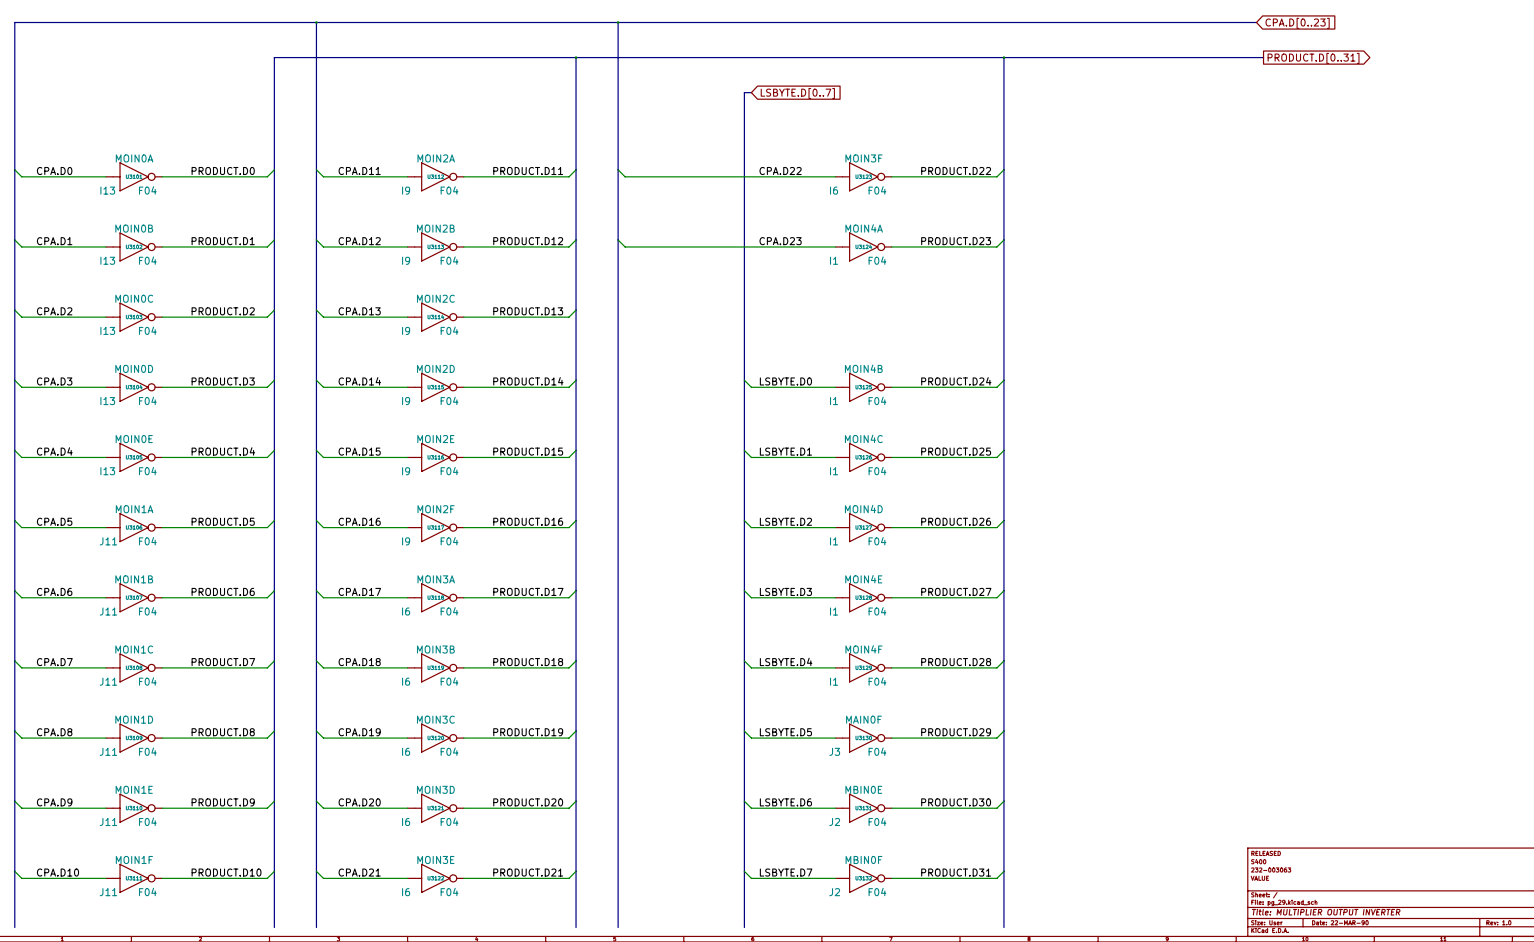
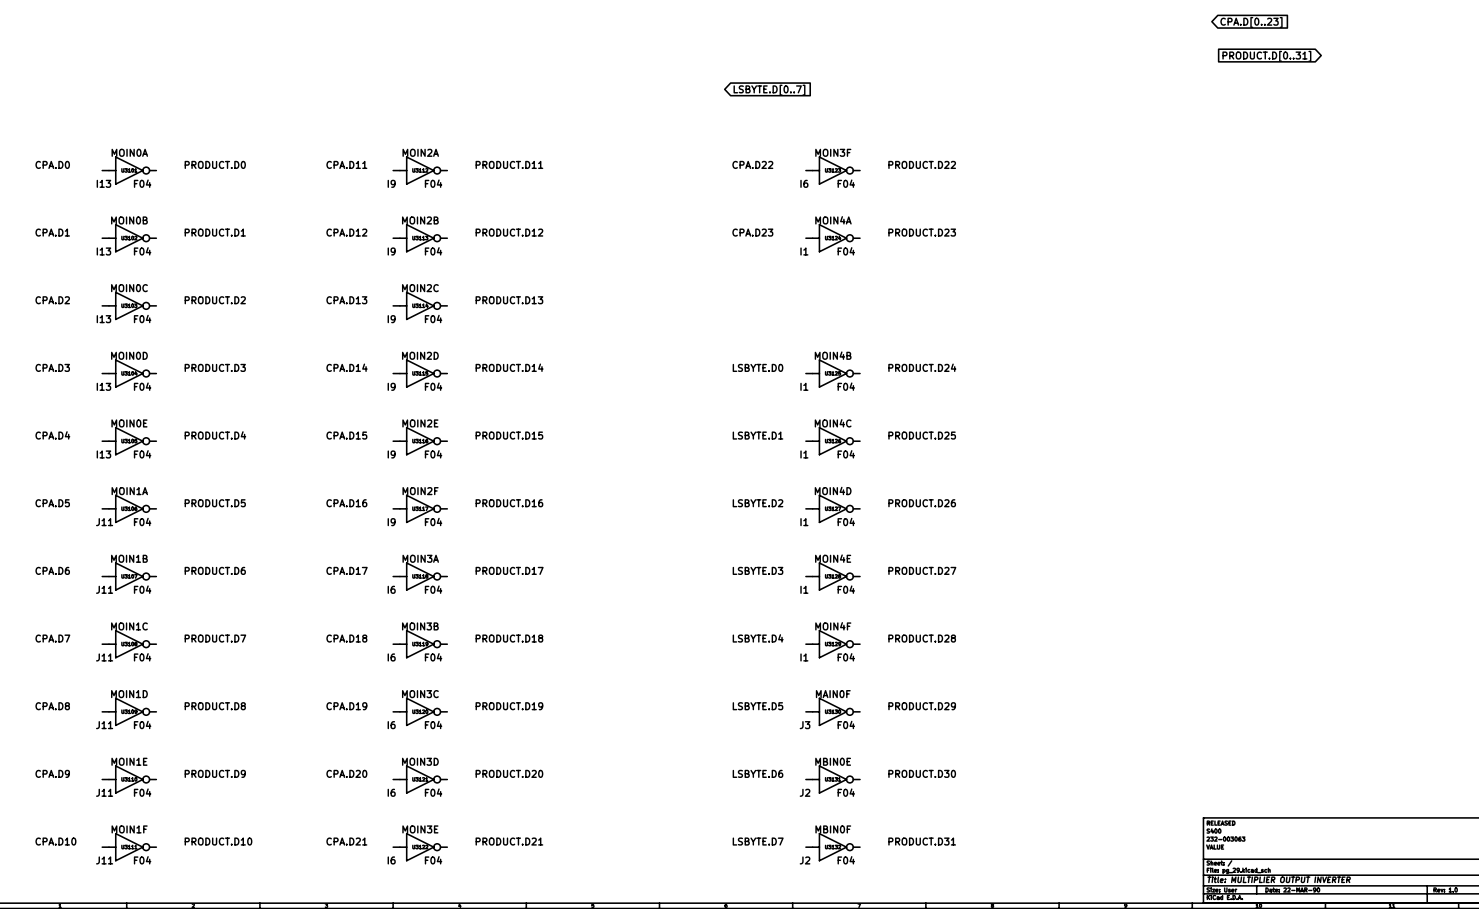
bus: (316, 22) (316, 927) -> none
junction: (316, 22) -> none
bus: (618, 22) (618, 927) -> none
junction: (618, 22) -> none
bus: (1256, 22) (14, 22) (14, 927) -> none
bus: (576, 57) (576, 927) -> none
junction: (576, 57) -> none
bus: (1003, 57) (1003, 927) -> none
junction: (1003, 57) -> none
bus: (1263, 57) (274, 57) (274, 927) -> none
bus: (751, 92) (744, 92) (744, 927) -> none
wire: (14, 169) (21, 176) (105, 176) -> none
wire: (274, 169) (267, 176) (162, 176) -> none
wire: (316, 169) (323, 176) (407, 176) -> none
wire: (576, 169) (569, 176) (463, 176) -> none
wire: (618, 169) (625, 176) (835, 176) -> none
wire: (1003, 169) (996, 176) (891, 176) -> none
wire: (14, 239) (21, 246) (105, 246) -> none
wire: (274, 239) (267, 246) (162, 246) -> none
wire: (316, 239) (323, 246) (407, 246) -> none
wire: (576, 239) (569, 246) (463, 246) -> none
wire: (618, 239) (625, 246) (835, 246) -> none
wire: (1003, 239) (996, 246) (891, 246) -> none
wire: (14, 310) (21, 317) (105, 317) -> none
wire: (274, 310) (267, 317) (162, 317) -> none
wire: (316, 310) (323, 317) (407, 317) -> none
wire: (576, 310) (569, 317) (463, 317) -> none
wire: (14, 380) (21, 387) (105, 387) -> none
wire: (274, 380) (267, 387) (162, 387) -> none
wire: (316, 380) (323, 387) (407, 387) -> none
wire: (576, 380) (569, 387) (463, 387) -> none
wire: (744, 380) (751, 387) (835, 387) -> none
wire: (1003, 380) (996, 387) (891, 387) -> none
wire: (14, 450) (21, 457) (105, 457) -> none
wire: (274, 450) (267, 457) (162, 457) -> none
wire: (316, 450) (323, 457) (407, 457) -> none
wire: (576, 450) (569, 457) (463, 457) -> none
wire: (744, 450) (751, 457) (835, 457) -> none
wire: (1003, 450) (996, 457) (891, 457) -> none
wire: (14, 520) (21, 527) (105, 527) -> none
wire: (274, 520) (267, 527) (162, 527) -> none
wire: (316, 520) (323, 527) (407, 527) -> none
wire: (576, 520) (569, 527) (463, 527) -> none
wire: (744, 520) (751, 527) (835, 527) -> none
wire: (1003, 520) (996, 527) (891, 527) -> none
wire: (14, 590) (21, 597) (105, 597) -> none
wire: (274, 590) (267, 597) (162, 597) -> none
wire: (316, 590) (323, 597) (407, 597) -> none
wire: (576, 590) (569, 597) (463, 597) -> none
wire: (744, 590) (751, 597) (835, 597) -> none
wire: (1003, 590) (996, 597) (891, 597) -> none
wire: (14, 660) (21, 667) (105, 667) -> none
wire: (274, 660) (267, 667) (162, 667) -> none
wire: (316, 660) (323, 667) (407, 667) -> none
wire: (576, 660) (569, 667) (463, 667) -> none
wire: (744, 660) (751, 667) (835, 667) -> none
wire: (1003, 660) (996, 667) (891, 667) -> none
wire: (14, 731) (21, 738) (105, 738) -> none
wire: (274, 731) (267, 738) (162, 738) -> none
wire: (316, 731) (323, 738) (407, 738) -> none
wire: (576, 731) (569, 738) (463, 738) -> none
wire: (744, 731) (751, 738) (835, 738) -> none
wire: (1003, 731) (996, 738) (891, 738) -> none
wire: (14, 801) (21, 808) (105, 808) -> none
wire: (274, 801) (267, 808) (162, 808) -> none
wire: (316, 801) (323, 808) (407, 808) -> none
wire: (576, 801) (569, 808) (463, 808) -> none
wire: (744, 801) (751, 808) (835, 808) -> none
wire: (1003, 801) (996, 808) (891, 808) -> none
wire: (14, 871) (21, 878) (105, 878) -> none
wire: (274, 871) (267, 878) (162, 878) -> none
wire: (316, 871) (323, 878) (407, 878) -> none
wire: (576, 871) (569, 878) (463, 878) -> none
wire: (744, 871) (751, 878) (835, 878) -> none
wire: (1003, 871) (996, 878) (891, 878) -> none

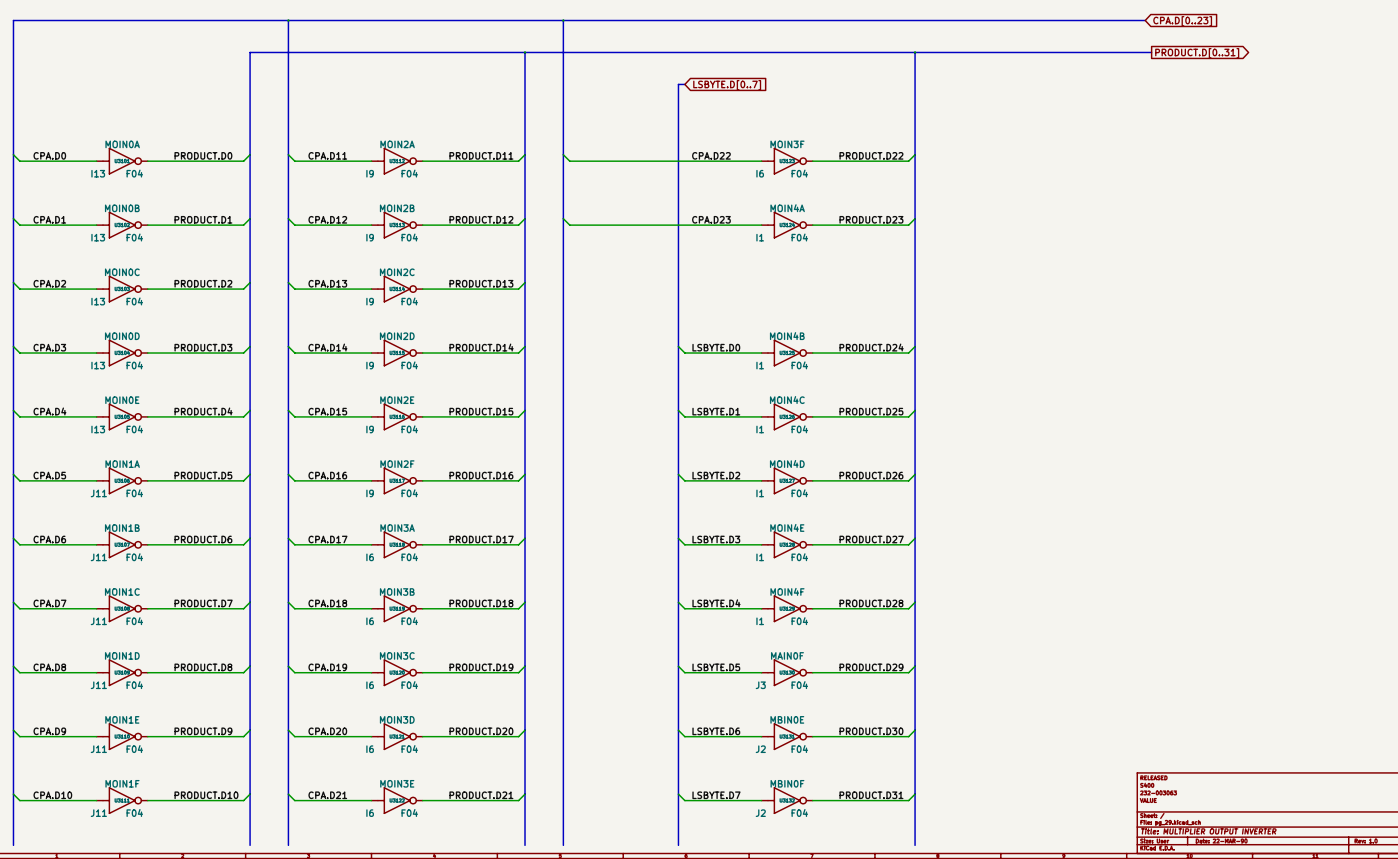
bus: none -> (288, 20) (288, 845)
junction: none -> (288, 20)
bus: none -> (563, 20) (563, 845)
junction: none -> (563, 20)
bus: none -> (1145, 20) (13, 20) (13, 845)
bus: none -> (525, 52) (525, 845)
junction: none -> (525, 52)
bus: none -> (915, 52) (915, 845)
junction: none -> (915, 52)
bus: none -> (1151, 52) (250, 52) (250, 845)
bus: none -> (684, 84) (678, 84) (678, 845)
wire: none -> (13, 154) (19, 161) (96, 161)
wire: none -> (250, 154) (243, 161) (147, 161)
wire: none -> (288, 154) (294, 161) (371, 161)
wire: none -> (525, 154) (518, 161) (422, 161)
wire: none -> (563, 154) (569, 161) (761, 161)
wire: none -> (915, 154) (908, 161) (812, 161)
wire: none -> (13, 218) (19, 225) (96, 225)
wire: none -> (250, 218) (243, 225) (147, 225)
wire: none -> (288, 218) (294, 225) (371, 225)
wire: none -> (525, 218) (518, 225) (422, 225)
wire: none -> (563, 218) (569, 225) (761, 225)
wire: none -> (915, 218) (908, 225) (812, 225)
wire: none -> (13, 282) (19, 289) (96, 289)
wire: none -> (250, 282) (243, 289) (147, 289)
wire: none -> (288, 282) (294, 289) (371, 289)
wire: none -> (525, 282) (518, 289) (422, 289)
wire: none -> (13, 346) (19, 353) (96, 353)
wire: none -> (250, 346) (243, 353) (147, 353)
wire: none -> (288, 346) (294, 353) (371, 353)
wire: none -> (525, 346) (518, 353) (422, 353)
wire: none -> (678, 346) (684, 353) (761, 353)
wire: none -> (915, 346) (908, 353) (812, 353)
wire: none -> (13, 410) (19, 416) (96, 416)
wire: none -> (250, 410) (243, 416) (147, 416)
wire: none -> (288, 410) (294, 416) (371, 416)
wire: none -> (525, 410) (518, 416) (422, 416)
wire: none -> (678, 410) (684, 416) (761, 416)
wire: none -> (915, 410) (908, 416) (812, 416)
wire: none -> (13, 474) (19, 480) (96, 480)
wire: none -> (250, 474) (243, 480) (147, 480)
wire: none -> (288, 474) (294, 480) (371, 480)
wire: none -> (525, 474) (518, 480) (422, 480)
wire: none -> (678, 474) (684, 480) (761, 480)
wire: none -> (915, 474) (908, 480) (812, 480)
wire: none -> (13, 538) (19, 544) (96, 544)
wire: none -> (250, 538) (243, 544) (147, 544)
wire: none -> (288, 538) (294, 544) (371, 544)
wire: none -> (525, 538) (518, 544) (422, 544)
wire: none -> (678, 538) (684, 544) (761, 544)
wire: none -> (915, 538) (908, 544) (812, 544)
wire: none -> (13, 602) (19, 608) (96, 608)
wire: none -> (250, 602) (243, 608) (147, 608)
wire: none -> (288, 602) (294, 608) (371, 608)
wire: none -> (525, 602) (518, 608) (422, 608)
wire: none -> (678, 602) (684, 608) (761, 608)
wire: none -> (915, 602) (908, 608) (812, 608)
wire: none -> (13, 666) (19, 672) (96, 672)
wire: none -> (250, 666) (243, 672) (147, 672)
wire: none -> (288, 666) (294, 672) (371, 672)
wire: none -> (525, 666) (518, 672) (422, 672)
wire: none -> (678, 666) (684, 672) (761, 672)
wire: none -> (915, 666) (908, 672) (812, 672)
wire: none -> (13, 730) (19, 736) (96, 736)
wire: none -> (250, 730) (243, 736) (147, 736)
wire: none -> (288, 730) (294, 736) (371, 736)
wire: none -> (525, 730) (518, 736) (422, 736)
wire: none -> (678, 730) (684, 736) (761, 736)
wire: none -> (915, 730) (908, 736) (812, 736)
wire: none -> (13, 794) (19, 800) (96, 800)
wire: none -> (250, 794) (243, 800) (147, 800)
wire: none -> (288, 794) (294, 800) (371, 800)
wire: none -> (525, 794) (518, 800) (422, 800)
wire: none -> (678, 794) (684, 800) (761, 800)
wire: none -> (915, 794) (908, 800) (812, 800)

